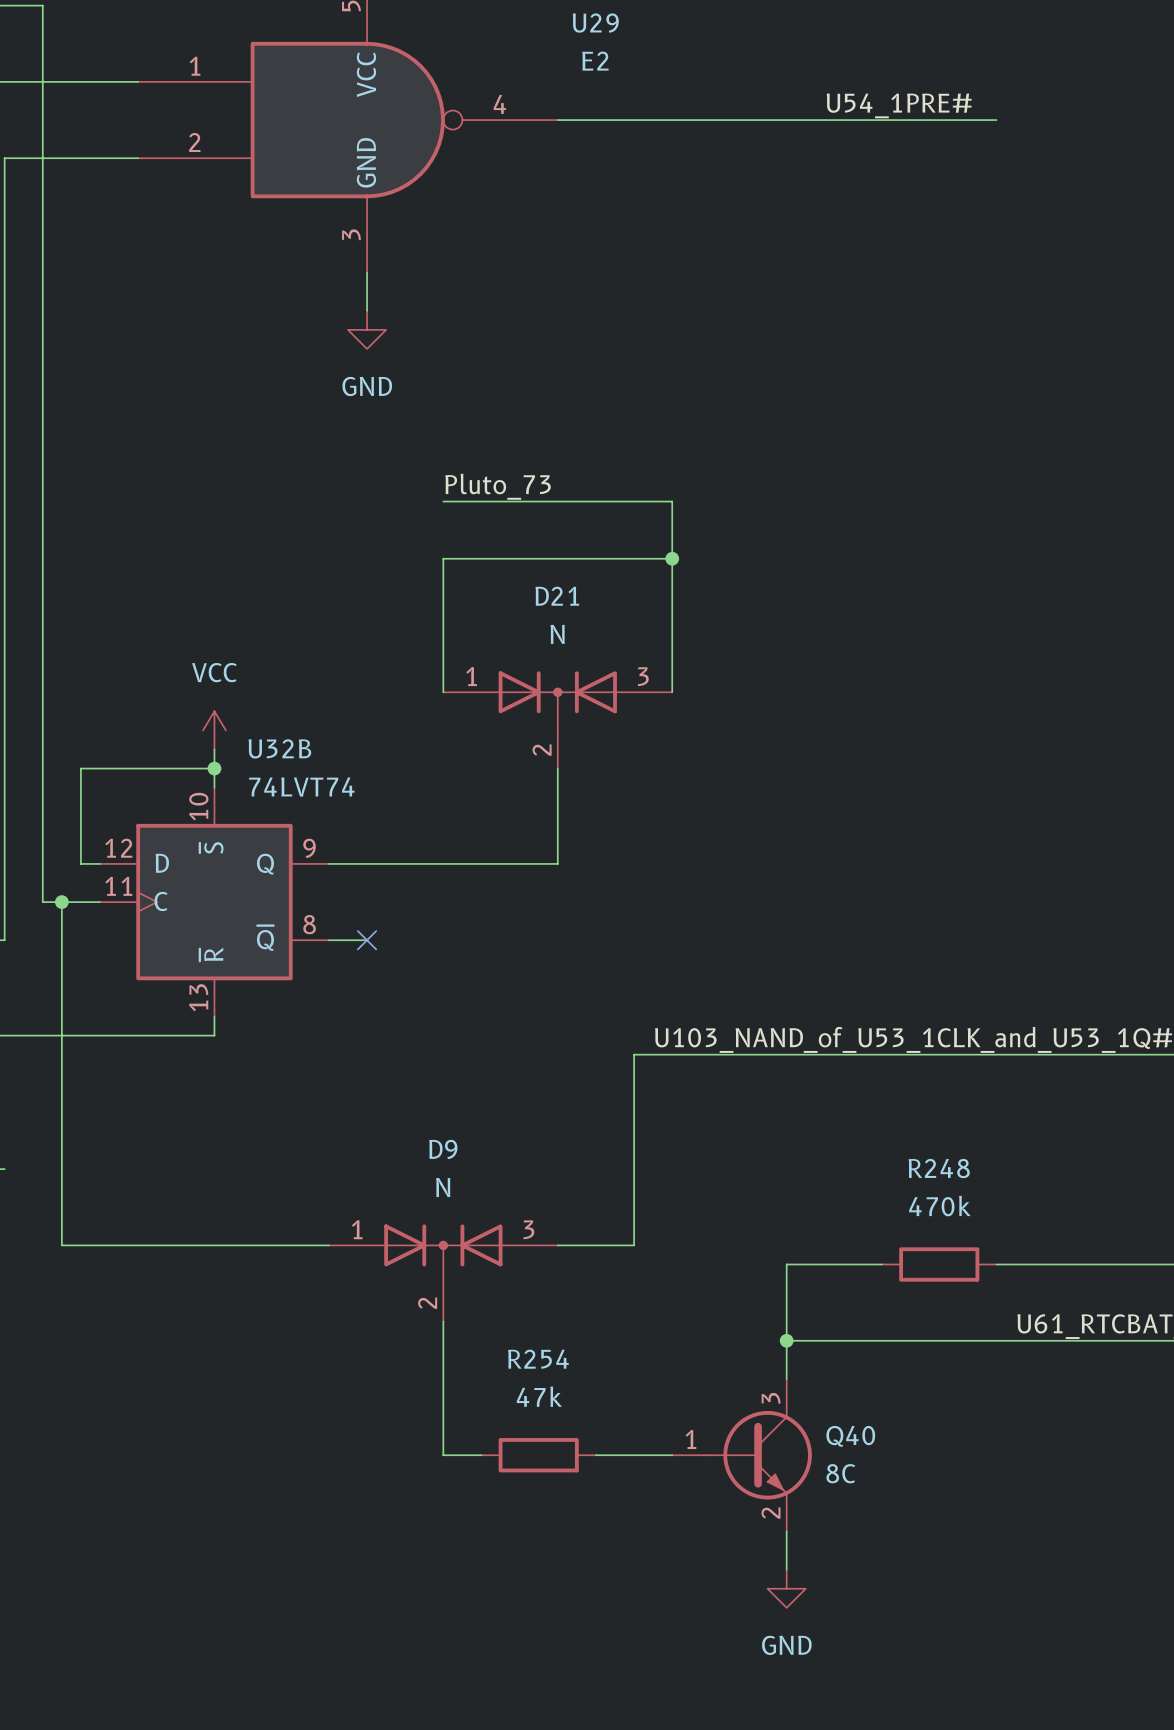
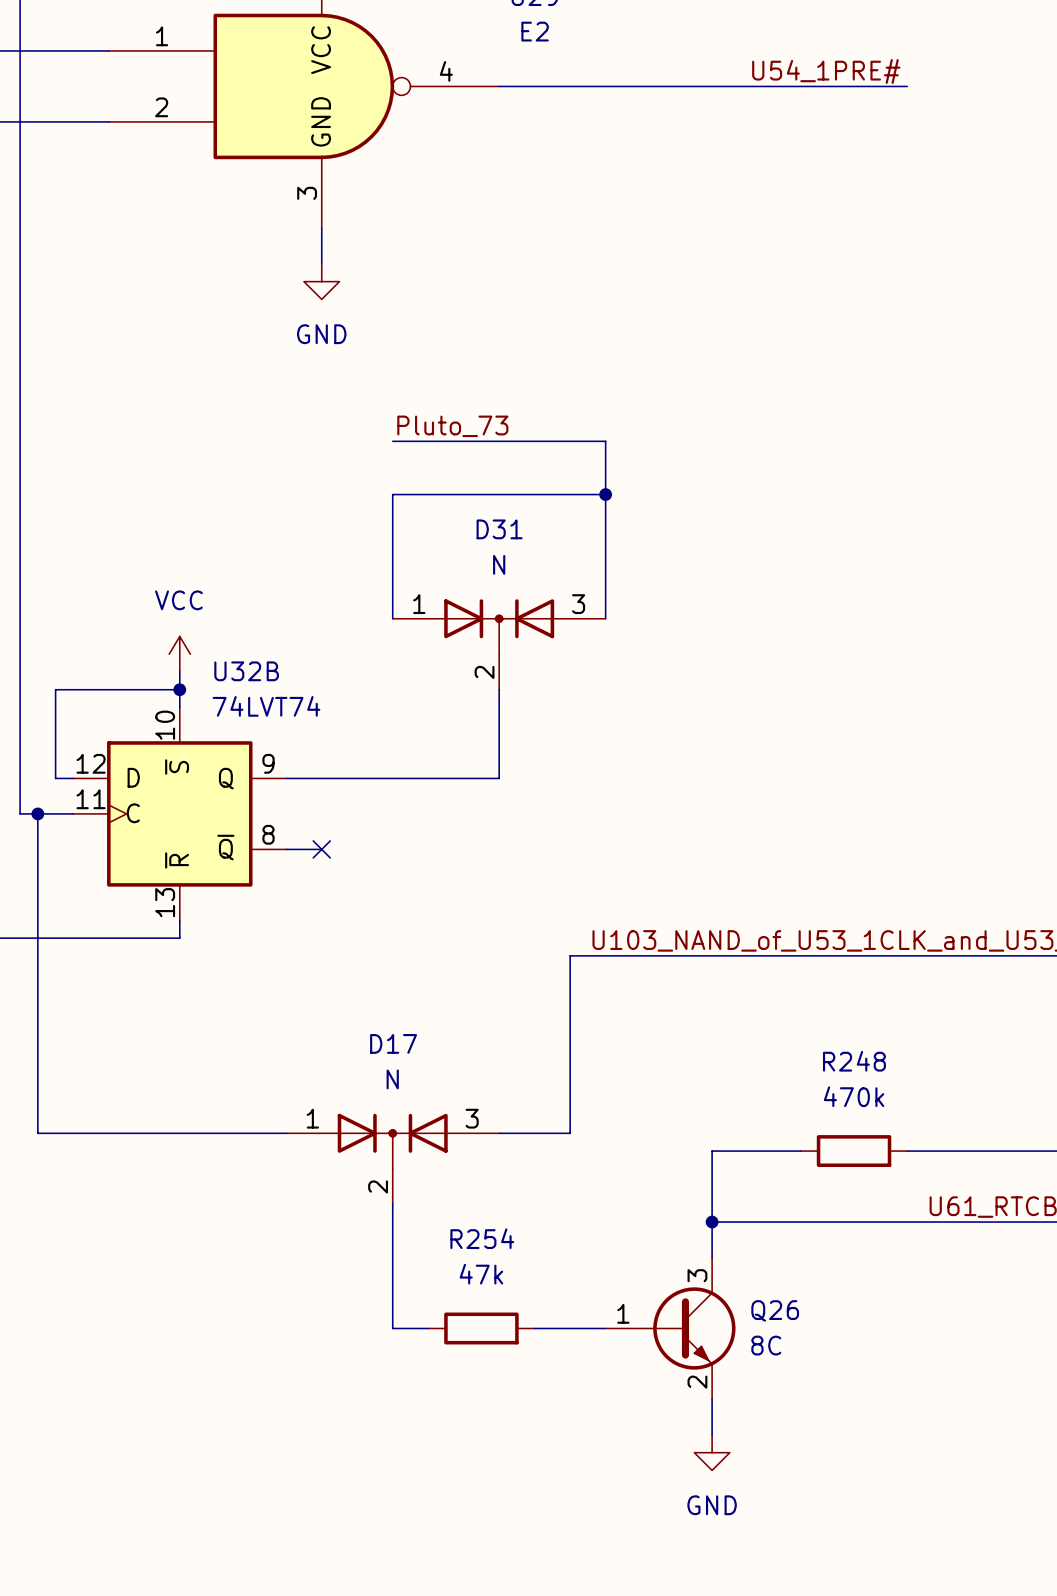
D21 name: D21 (557, 596) -> D31 (499, 529)
D9 name: D9 (443, 1149) -> D17 (393, 1043)
Q40 name: Q40 (850, 1436) -> Q26 (775, 1310)

